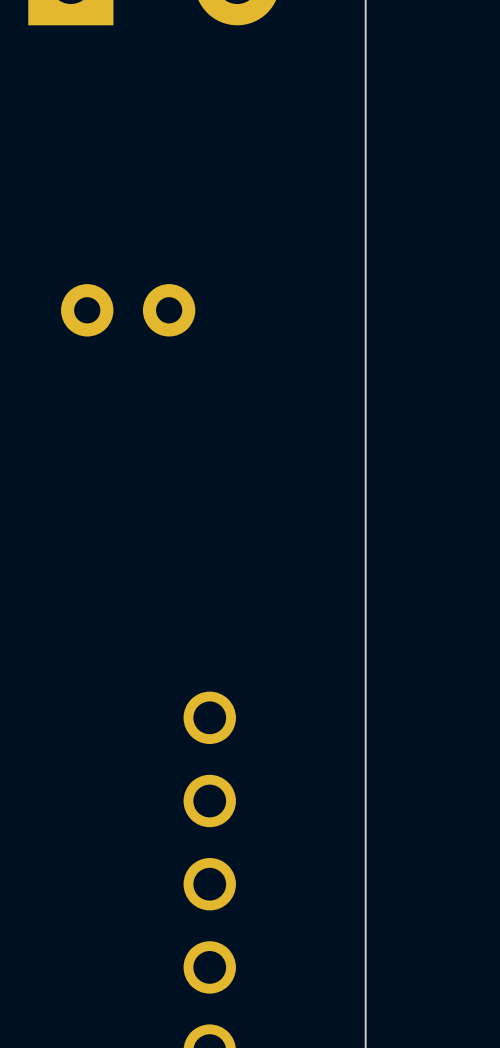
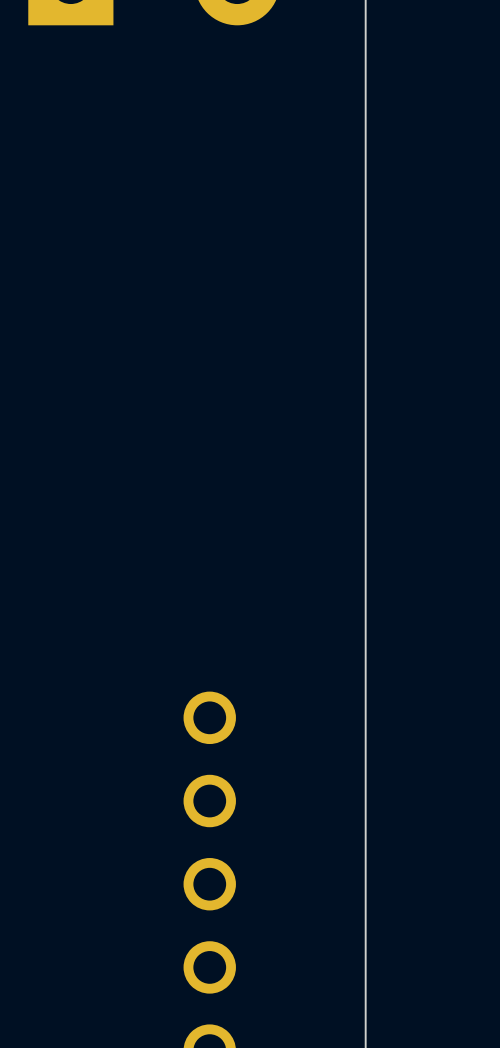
part: (128, 310) -> none

